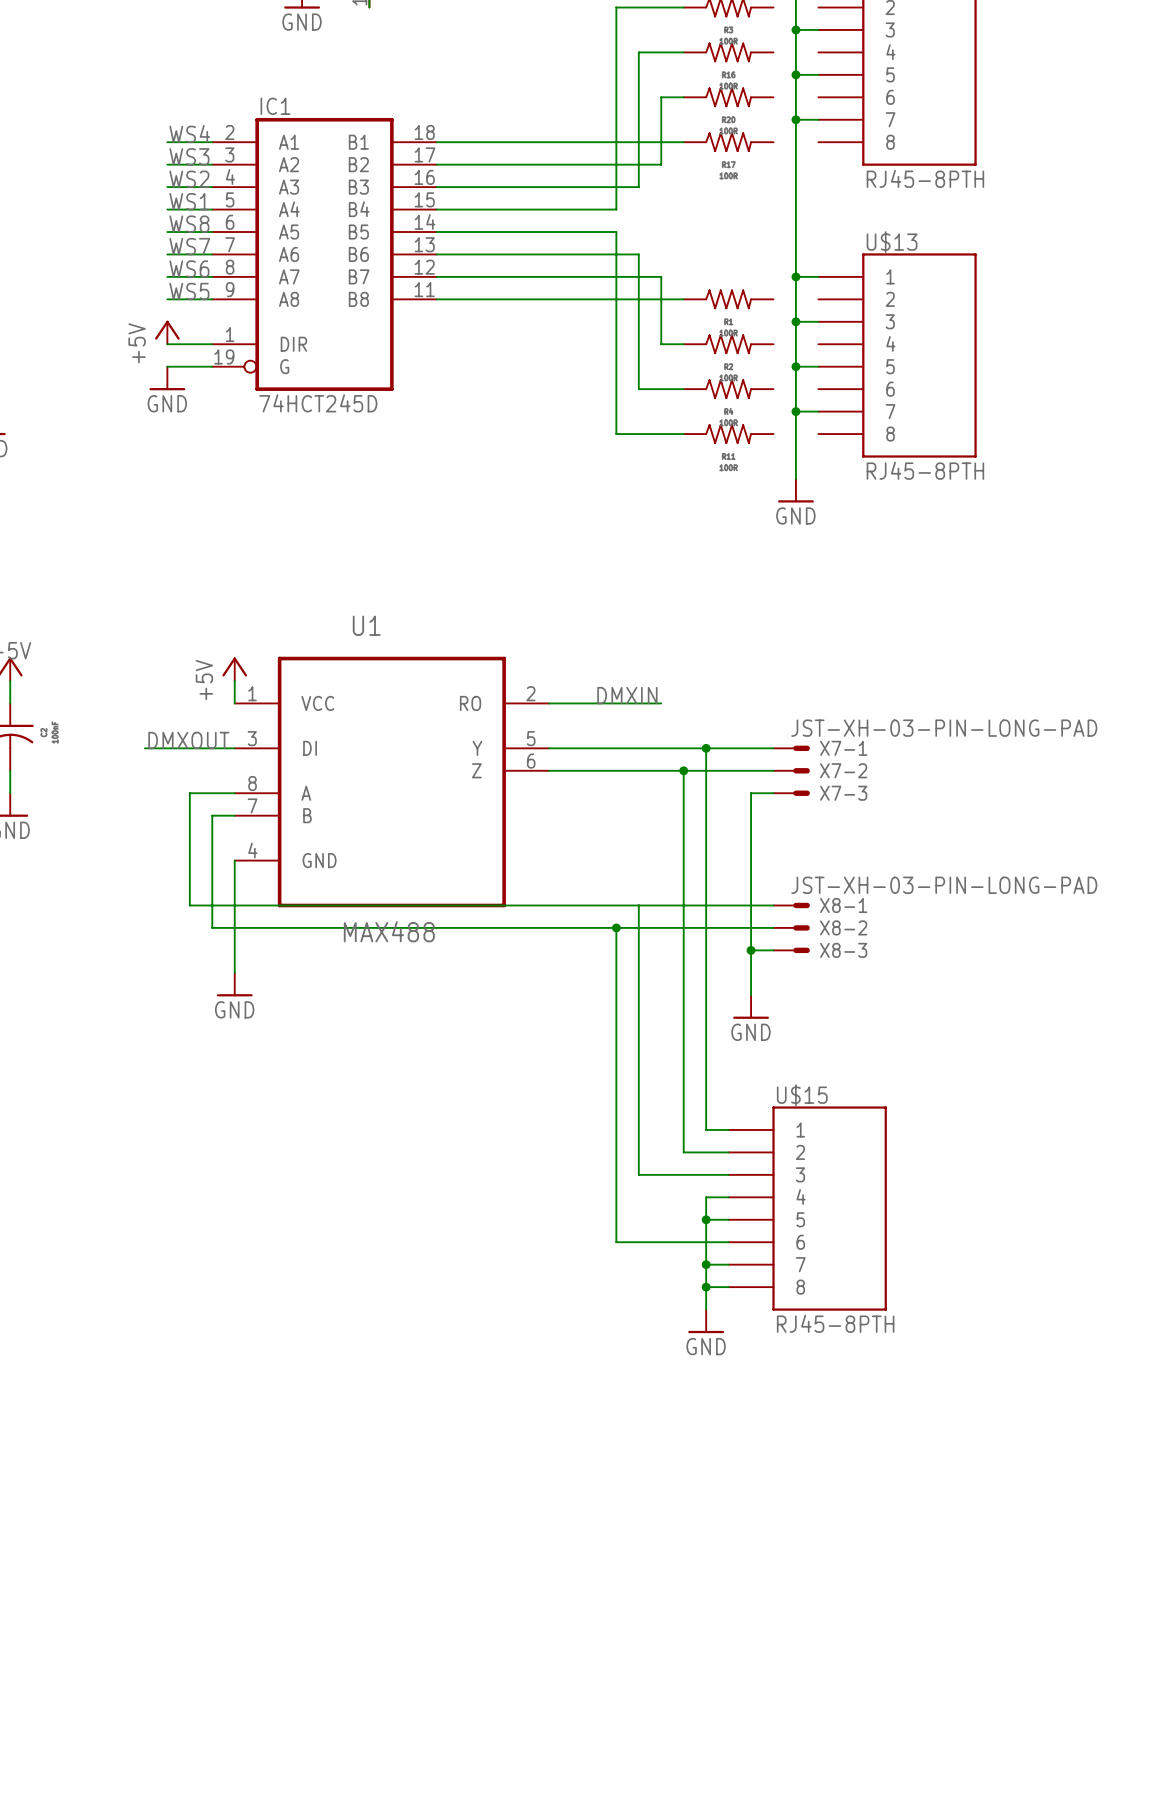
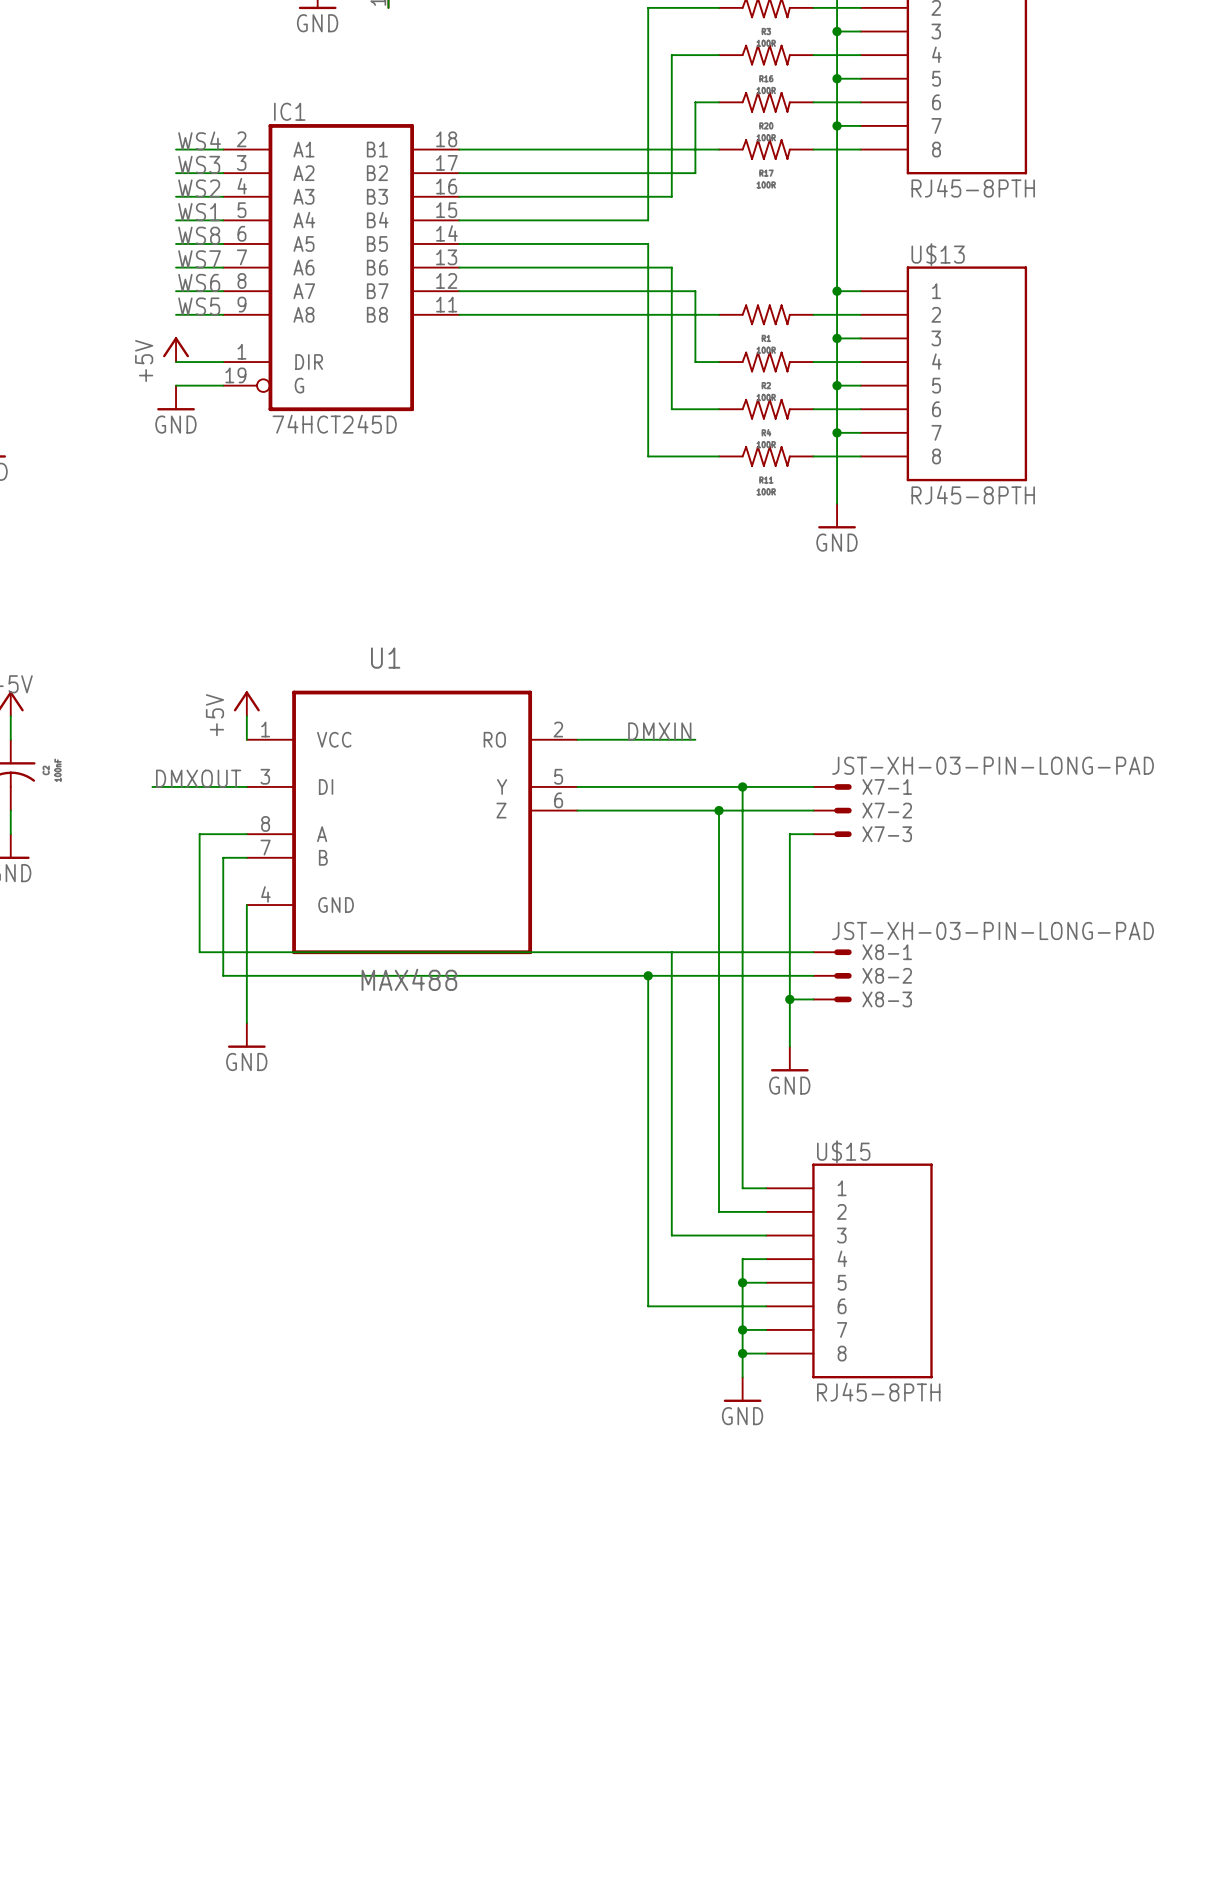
wire: none -> (813, 7) (860, 7)
wire: none -> (813, 55) (860, 55)
wire: none -> (813, 102) (860, 102)
wire: none -> (813, 149) (860, 149)
wire: none -> (813, 314) (860, 314)
wire: none -> (813, 362) (860, 362)
wire: none -> (813, 409) (860, 409)
wire: none -> (813, 456) (860, 456)

